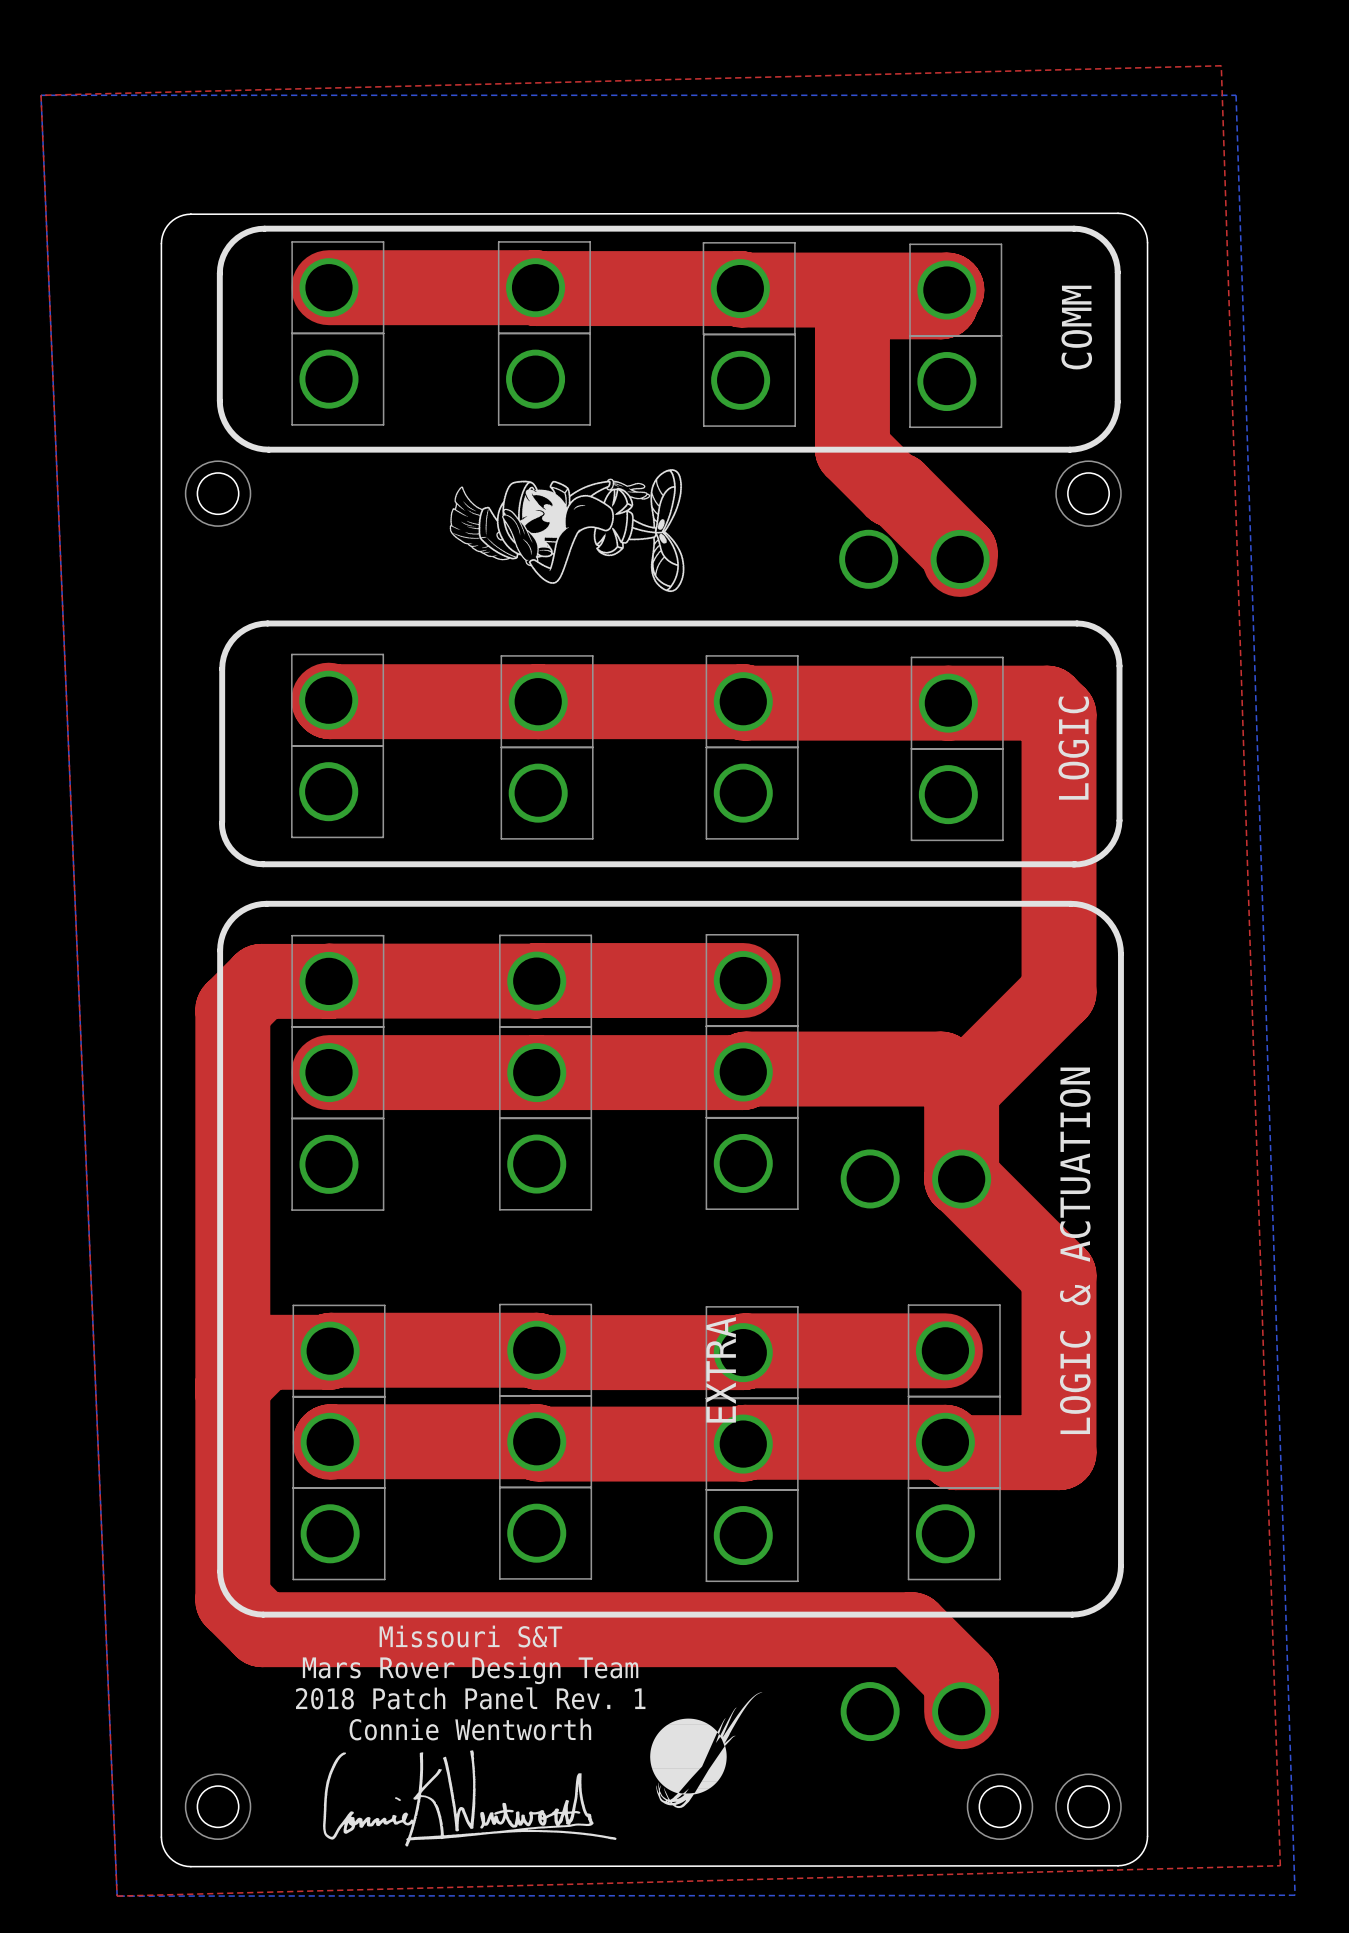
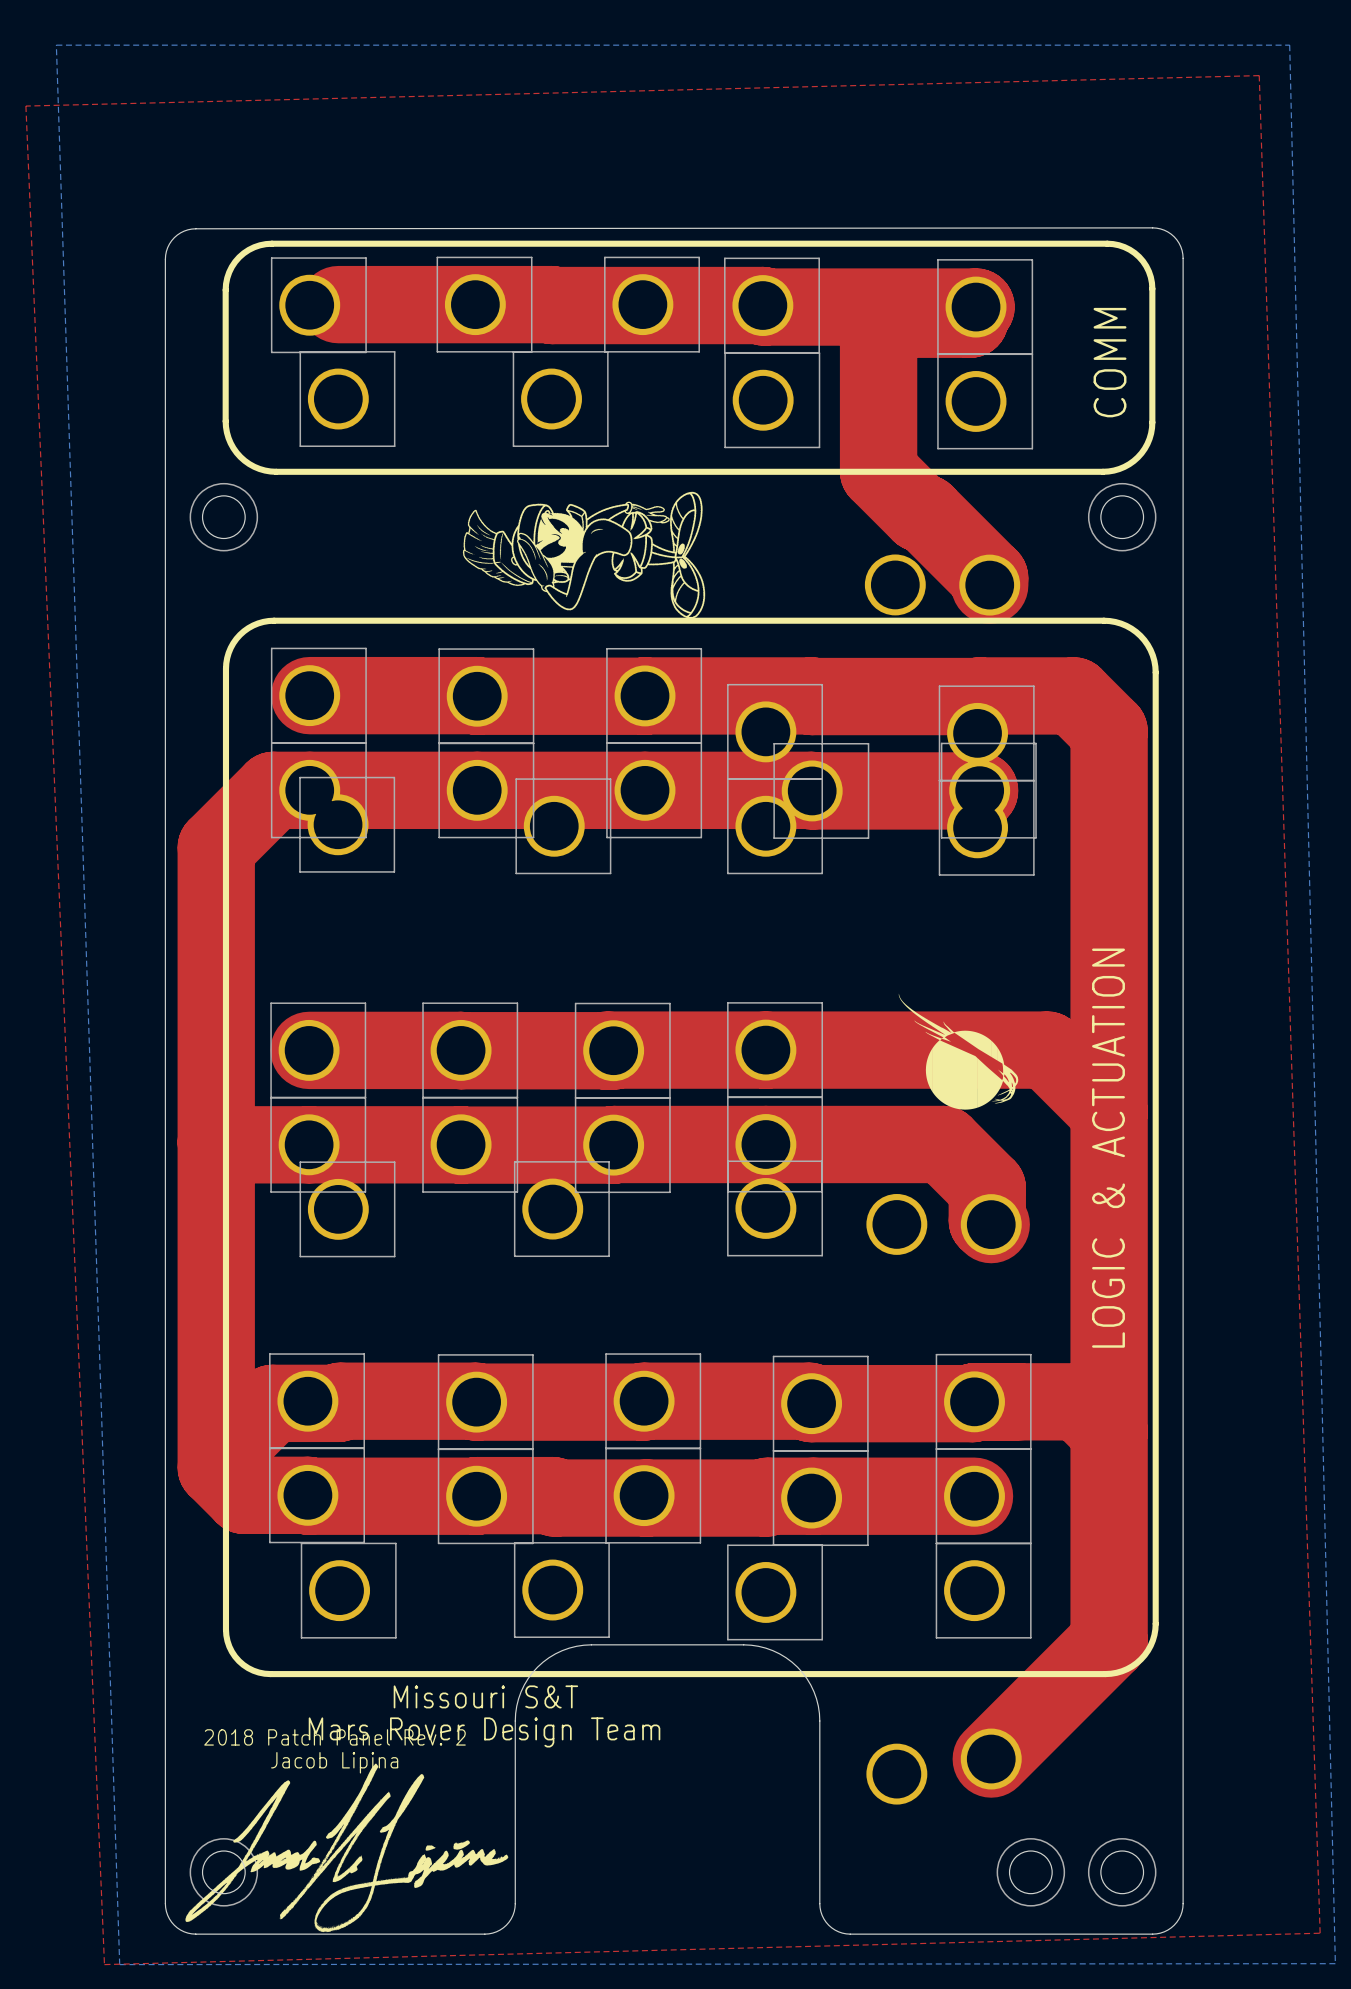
top zone outline: (1221, 65) (41, 95) (117, 1896) (1280, 1865) -> (1259, 75) (25, 106) (104, 1964) (1320, 1933)
part position: (337, 287) -> (318, 305)
part: none -> (484, 304)
part: (544, 287) -> none
part: none -> (652, 304)
top track: none -> (309, 695) (1073, 695) (1109, 731) (1109, 1641) (991, 1759)
part: none -> (318, 695)
part: none -> (654, 695)
part: none -> (486, 696)
top track: (328, 700) (1047, 703) (1059, 714) (1059, 992) (961, 1089) -> none
part: (337, 700) -> none
part: (547, 701) -> none
text: LOGIC (1073, 748) -> none
part: none -> (318, 790)
part: none -> (486, 790)
part: none -> (654, 790)
part: none -> (821, 790)
part: none -> (988, 790)
line: (221, 822) (225, 838) (233, 852) (247, 861) (263, 864) (1075, 864) -> none
line: (222, 822) (222, 662) (225, 651) (231, 641) (239, 632) (255, 625) (267, 623) (1077, 623) (1088, 624) (1102, 632) (1110, 640) (1118, 654) (1119, 820) (1115, 837) (1105, 852) (1090, 861) (1073, 864) -> none
line: (220, 950) (224, 930) (233, 917) (246, 908) (266, 903) (1070, 903) (1092, 908) (1106, 918) (1116, 932) (1120, 953) -> (225, 988) (226, 663) (233, 643) (240, 634) (253, 625) (274, 620) (1103, 620) (1126, 625) (1140, 635) (1150, 650) (1155, 666) (1155, 992)
drawing: none -> [898, 993, 1019, 1110]
top track: (743, 980) (261, 981) (232, 1010) (232, 1600) (262, 1629) (911, 1629) (961, 1679) (961, 1711) -> none
part position: (752, 980) -> (775, 1050)
part: (337, 981) -> none
part: (545, 981) -> none
top track: none -> (309, 1050) (1047, 1050) (1109, 1111)
part: none -> (318, 1050)
part: none -> (470, 1050)
part: none -> (622, 1050)
part position: (752, 1071) -> (775, 1144)
top track: (329, 1072) (742, 1072) (746, 1069) (940, 1069) (961, 1089) -> none
part: (337, 1072) -> none
part: (545, 1072) -> none
top track: (961, 1089) (961, 1179) (1059, 1275) (1059, 1452) (955, 1452) (945, 1442) -> none
top track: none -> (216, 1142) (218, 1144) (943, 1144) (987, 1188) (987, 1220) (991, 1224)
part: none -> (318, 1144)
part: none -> (470, 1144)
part: none -> (622, 1145)
text position: LOGIC & ACTUATION (1075, 1250) -> LOGIC & ACTUATION (1108, 1148)
top track: (462, 1350) (536, 1350) (539, 1352) (945, 1350) -> (475, 1401) (809, 1401) (811, 1403) (1079, 1401) (1109, 1431)
part: (545, 1350) -> none
part: none -> (653, 1401)
part position: (339, 1351) -> (317, 1401)
part: none -> (485, 1402)
part position: (752, 1352) -> (820, 1403)
text: EXTRA (721, 1369) -> none
top track: (463, 1441) (330, 1442) -> (477, 1495) (243, 1495) (216, 1467) (216, 847) (273, 790) (979, 790)
part: (545, 1441) -> none
part: none -> (653, 1495)
part position: (339, 1442) -> (317, 1495)
part: none -> (485, 1496)
part position: (752, 1444) -> (820, 1498)
drawing: [650, 1692, 763, 1809] -> none
text: 2018 Patch Panel Rev. 1 (470, 1698) -> 2018 Patch Panel Rev. 2 (334, 1737)
text: none -> Jacob Lipina (334, 1762)
drawing: none -> [185, 1763, 509, 1933]
part position: (961, 1711) -> (991, 1759)
text: Connie Wentworth (470, 1729) -> none
drawing: [323, 1750, 617, 1847] -> none
board edge: (1147, 1836) (1145, 1847) (1138, 1857) (1129, 1863) (1118, 1865) (190, 1866) -> (1183, 1902) (1182, 1911) (1176, 1922) (1167, 1930) (1156, 1933) (850, 1934) (838, 1931) (826, 1922) (820, 1907) (819, 1713) (814, 1691) (802, 1672) (779, 1653) (751, 1645) (591, 1644) (569, 1648) (549, 1657) (528, 1678) (518, 1698) (515, 1720) (515, 1907) (511, 1918) (503, 1927) (492, 1933) (484, 1934) (195, 1934)
bottom zone outline: (1295, 1895) (1236, 95) (41, 95) (117, 1896) -> (1335, 1963) (1289, 45) (56, 45) (119, 1964)

